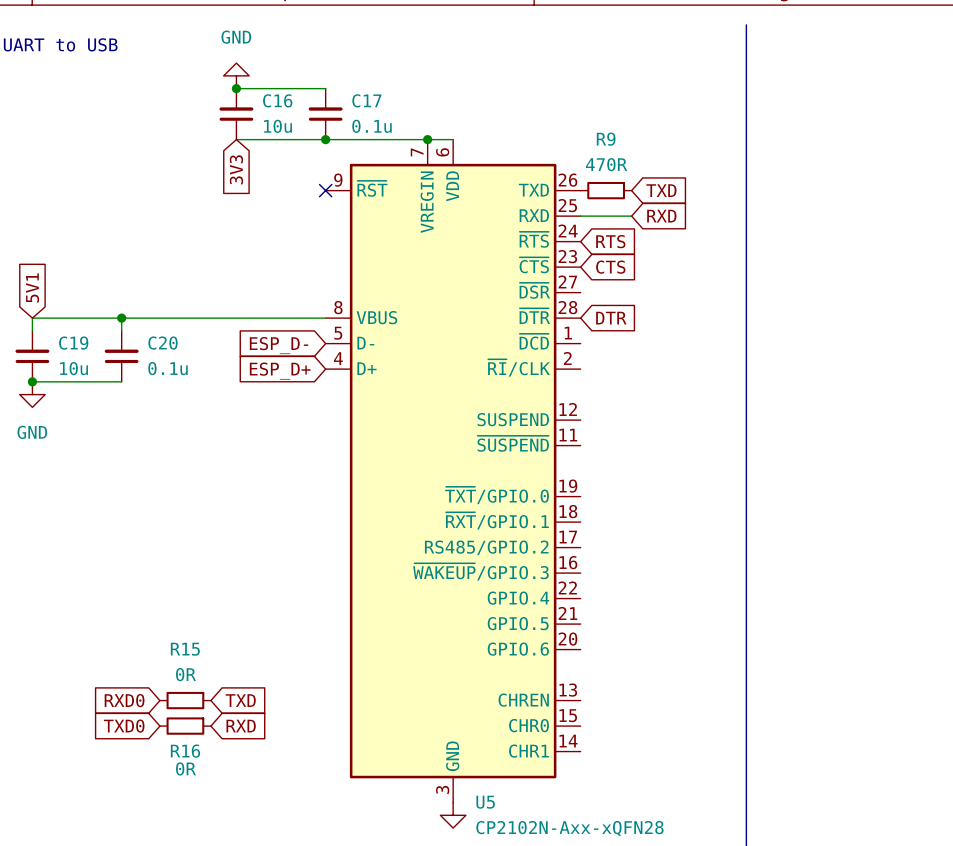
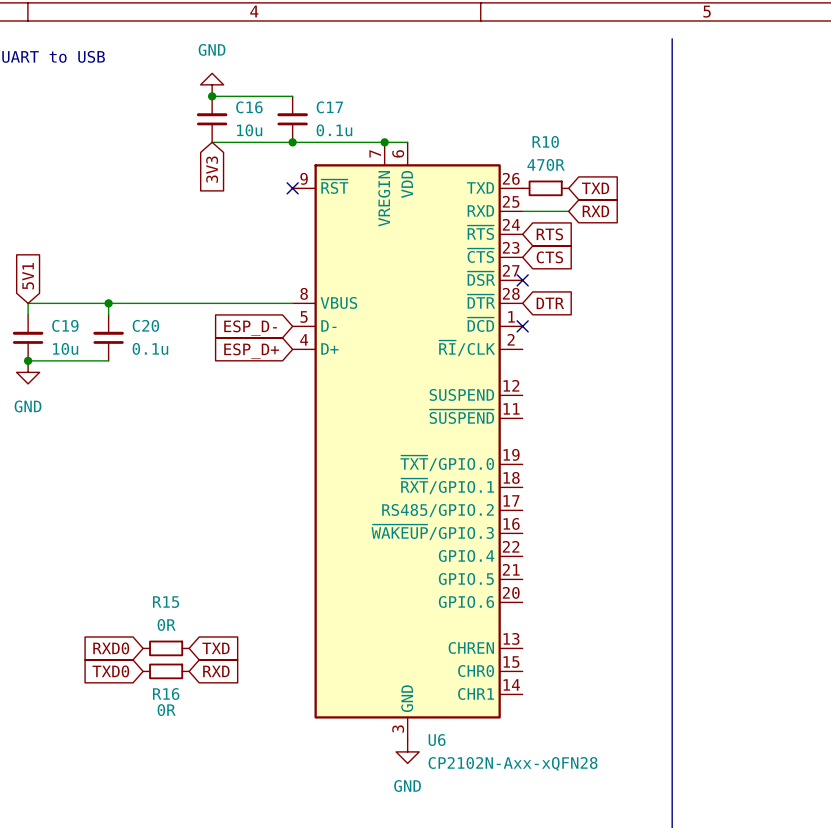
R9 name: R9 (606, 139) -> R10 (545, 141)
no-connect mark: none -> (522, 280)
no-connect mark: none -> (522, 326)
U5 name: U5 (485, 802) -> U6 (437, 740)

